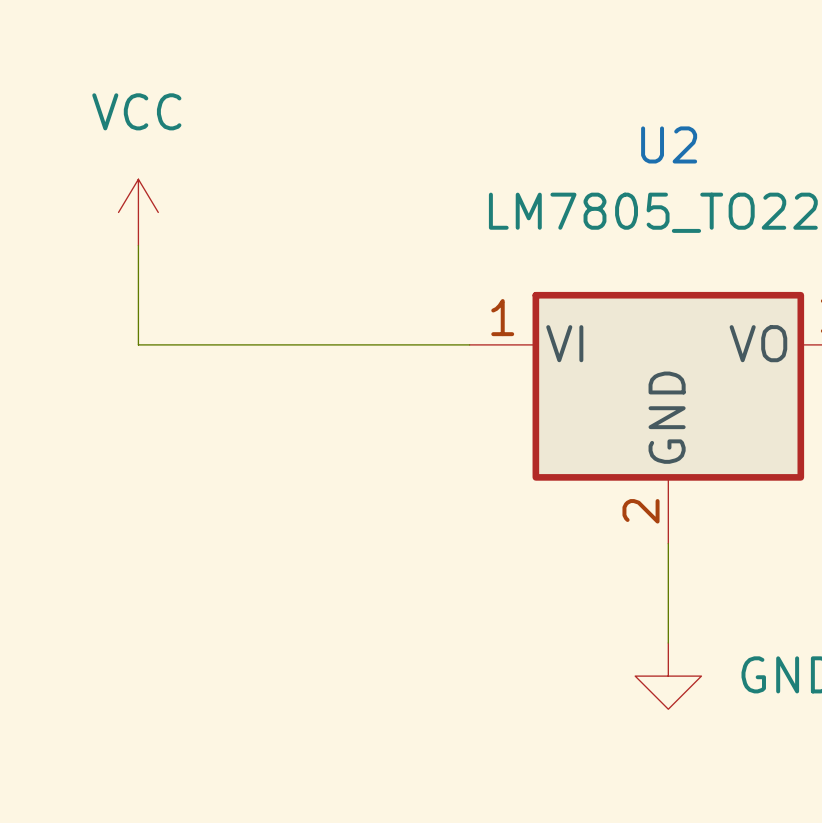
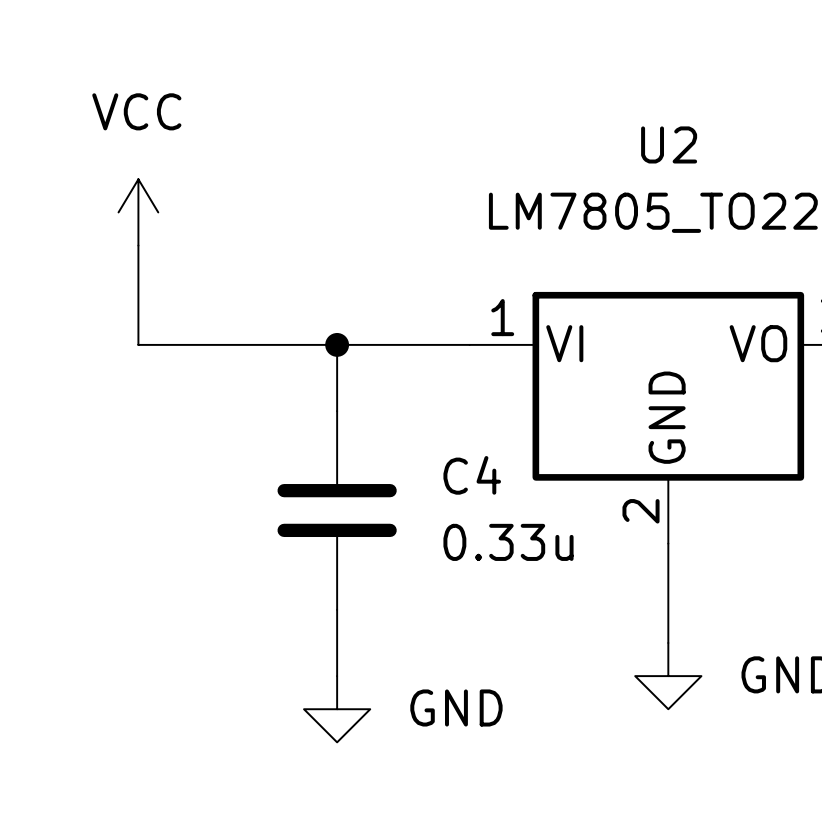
wire: none -> (337, 344) (337, 411)
junction: none -> (337, 344)
C4: none -> 0.33u (337, 510)
wire: none -> (337, 609) (337, 676)
power symbol: none -> GND (337, 709)

